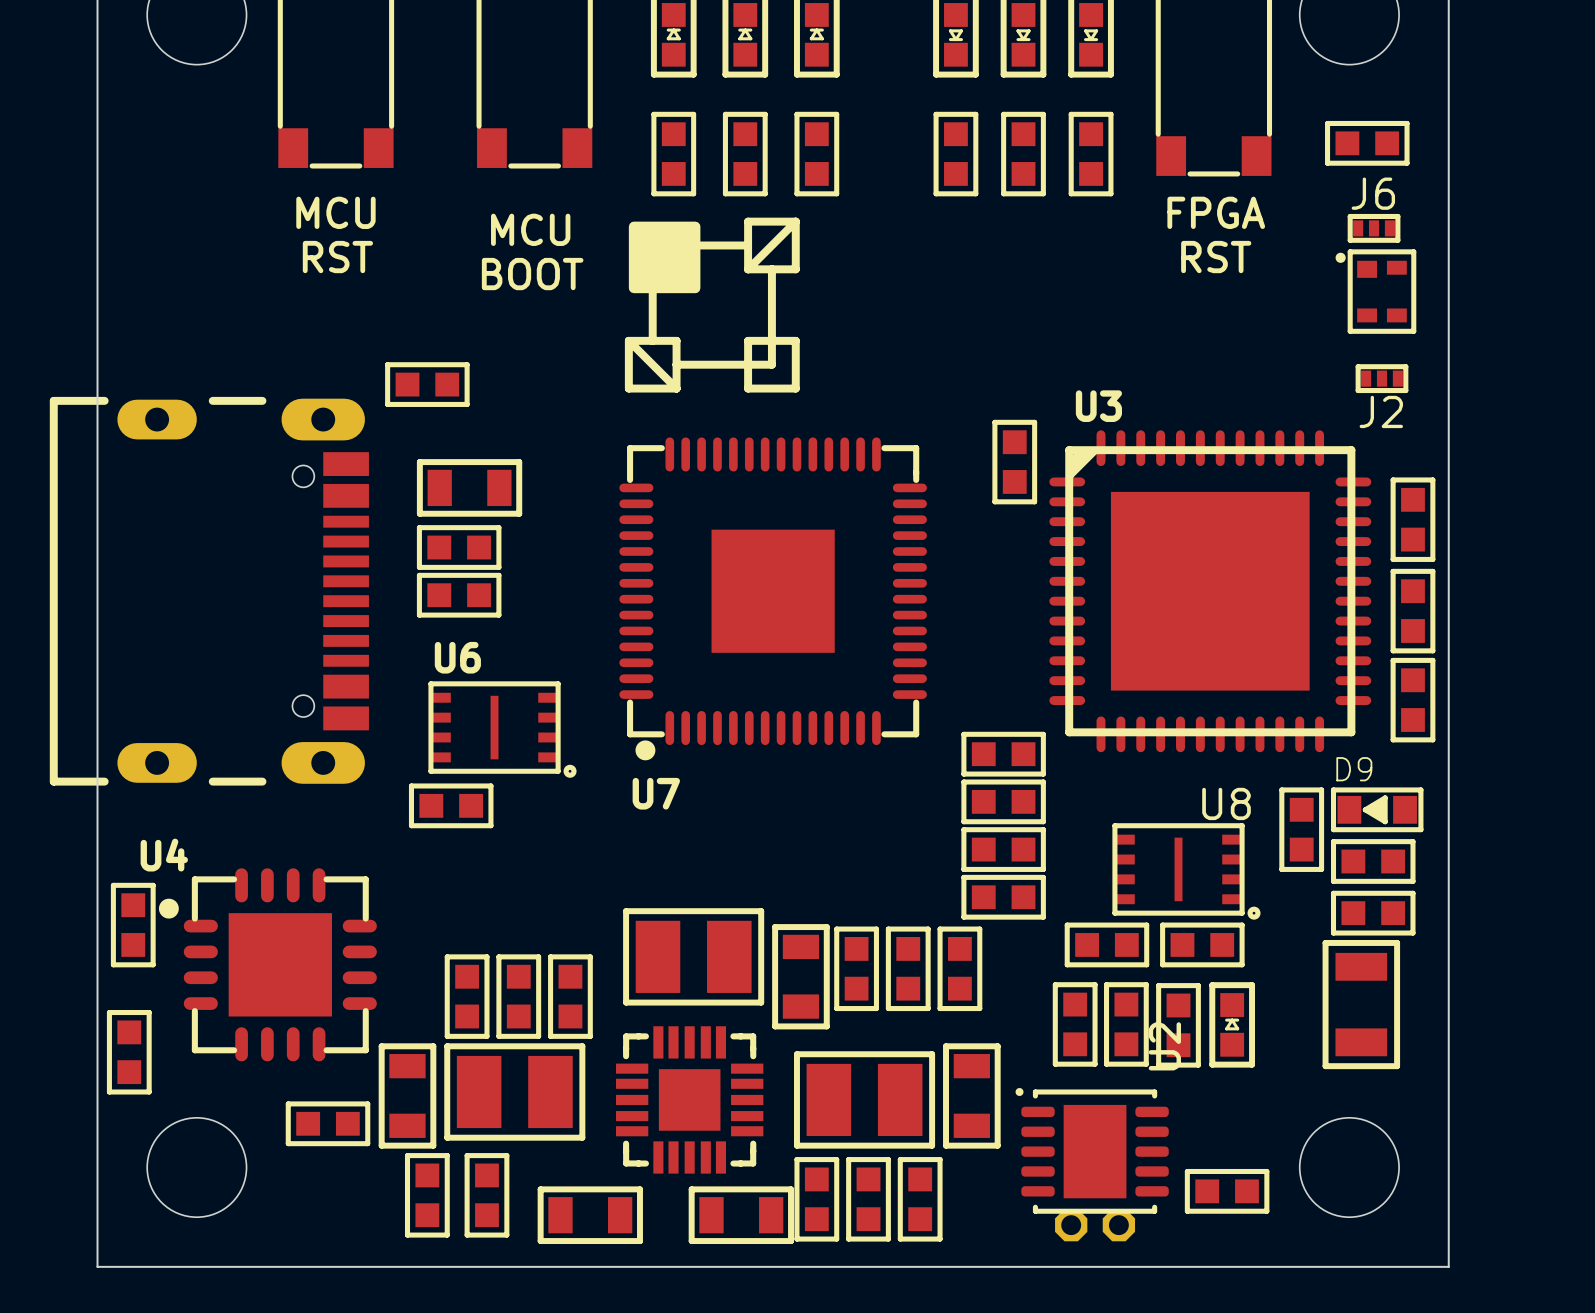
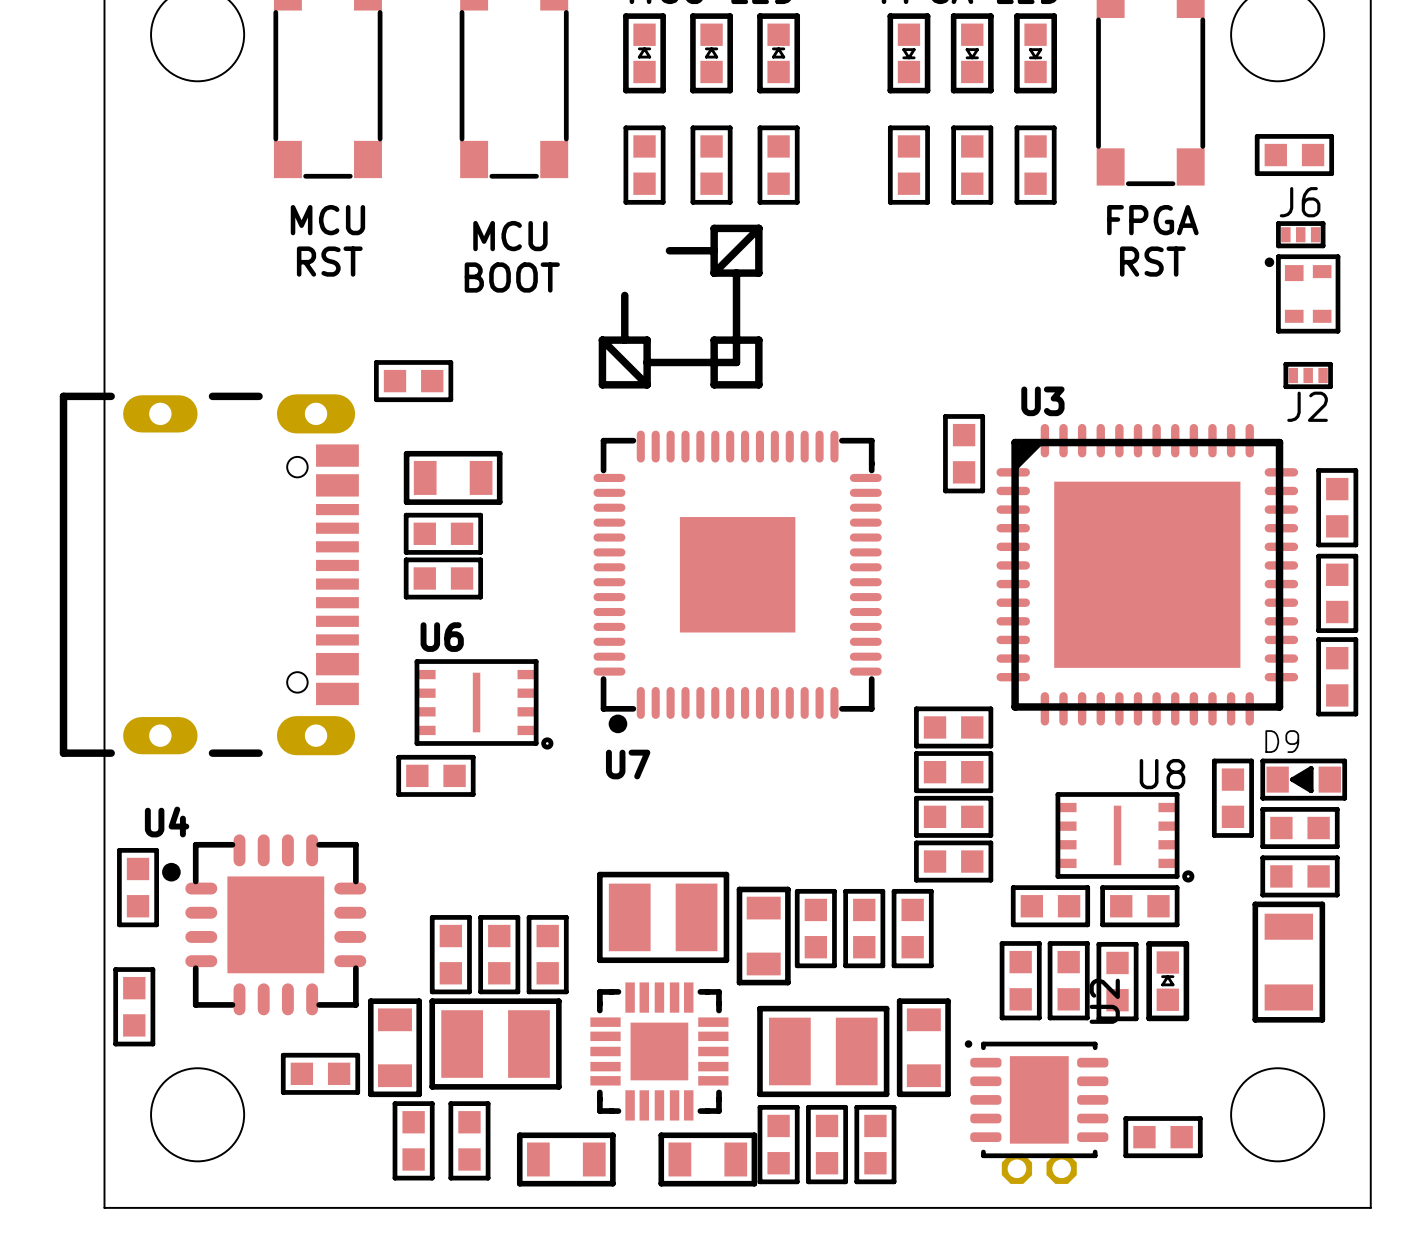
drawing: [628, 221, 701, 294] -> none

